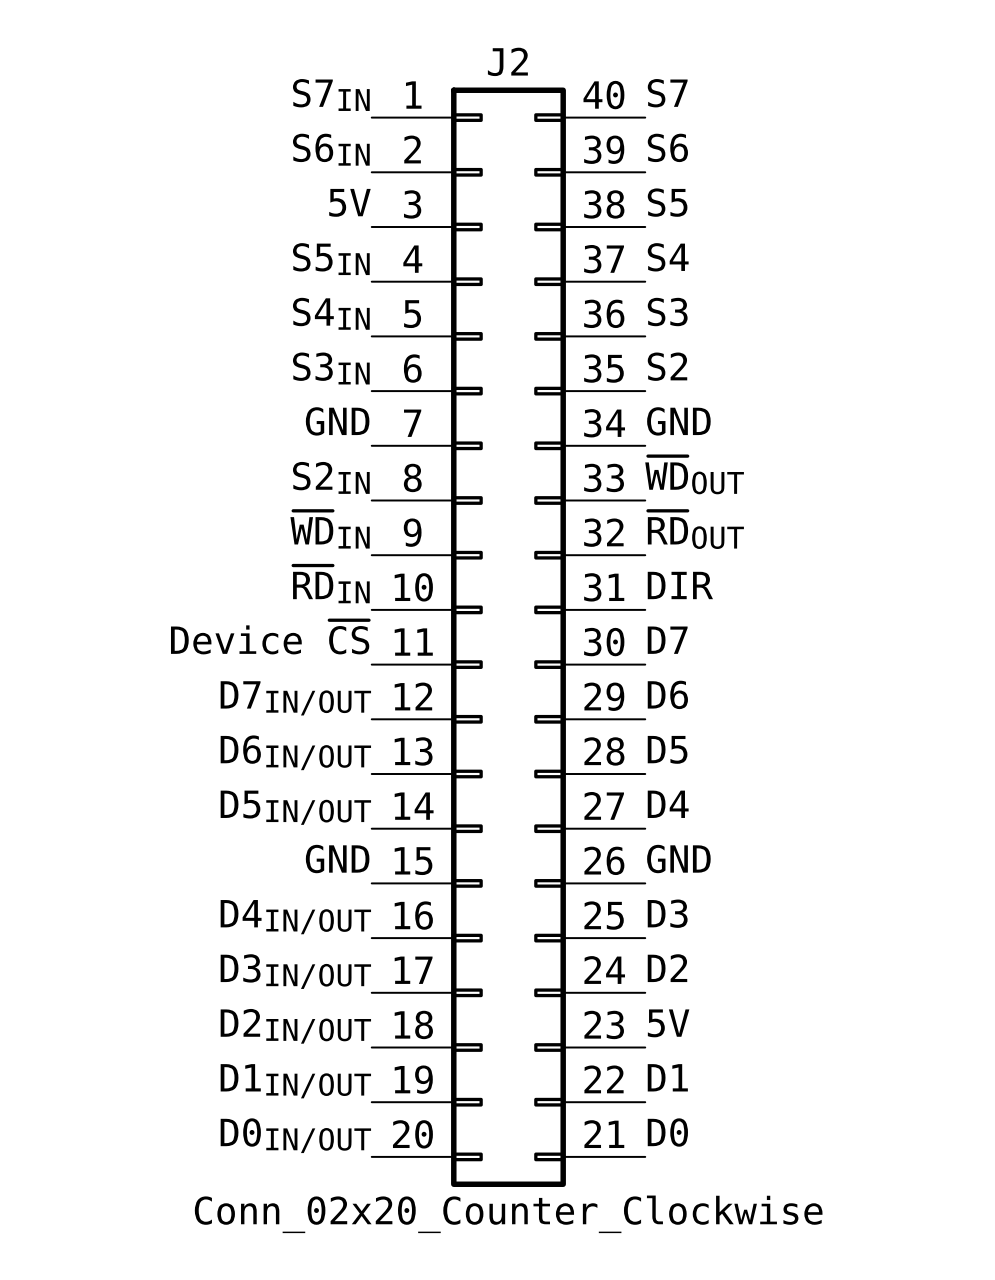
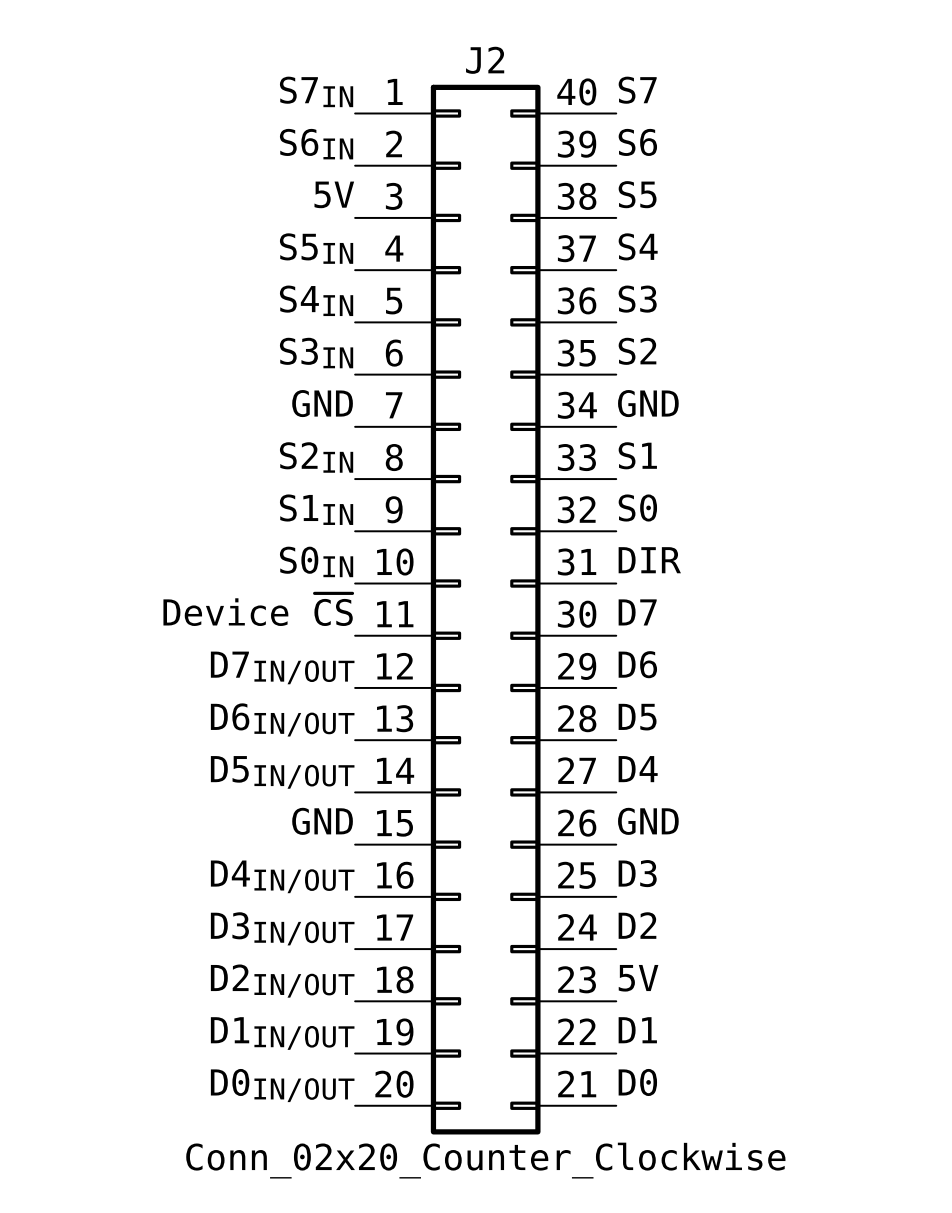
label: ~{WD}OUT (694, 475) -> S1 (637, 455)
label: ~{WD}IN (330, 529) -> S1IN (316, 509)
label: ~{RD}OUT (695, 529) -> S0 (637, 508)
label: ~{RD}IN (331, 584) -> S0IN (316, 561)

